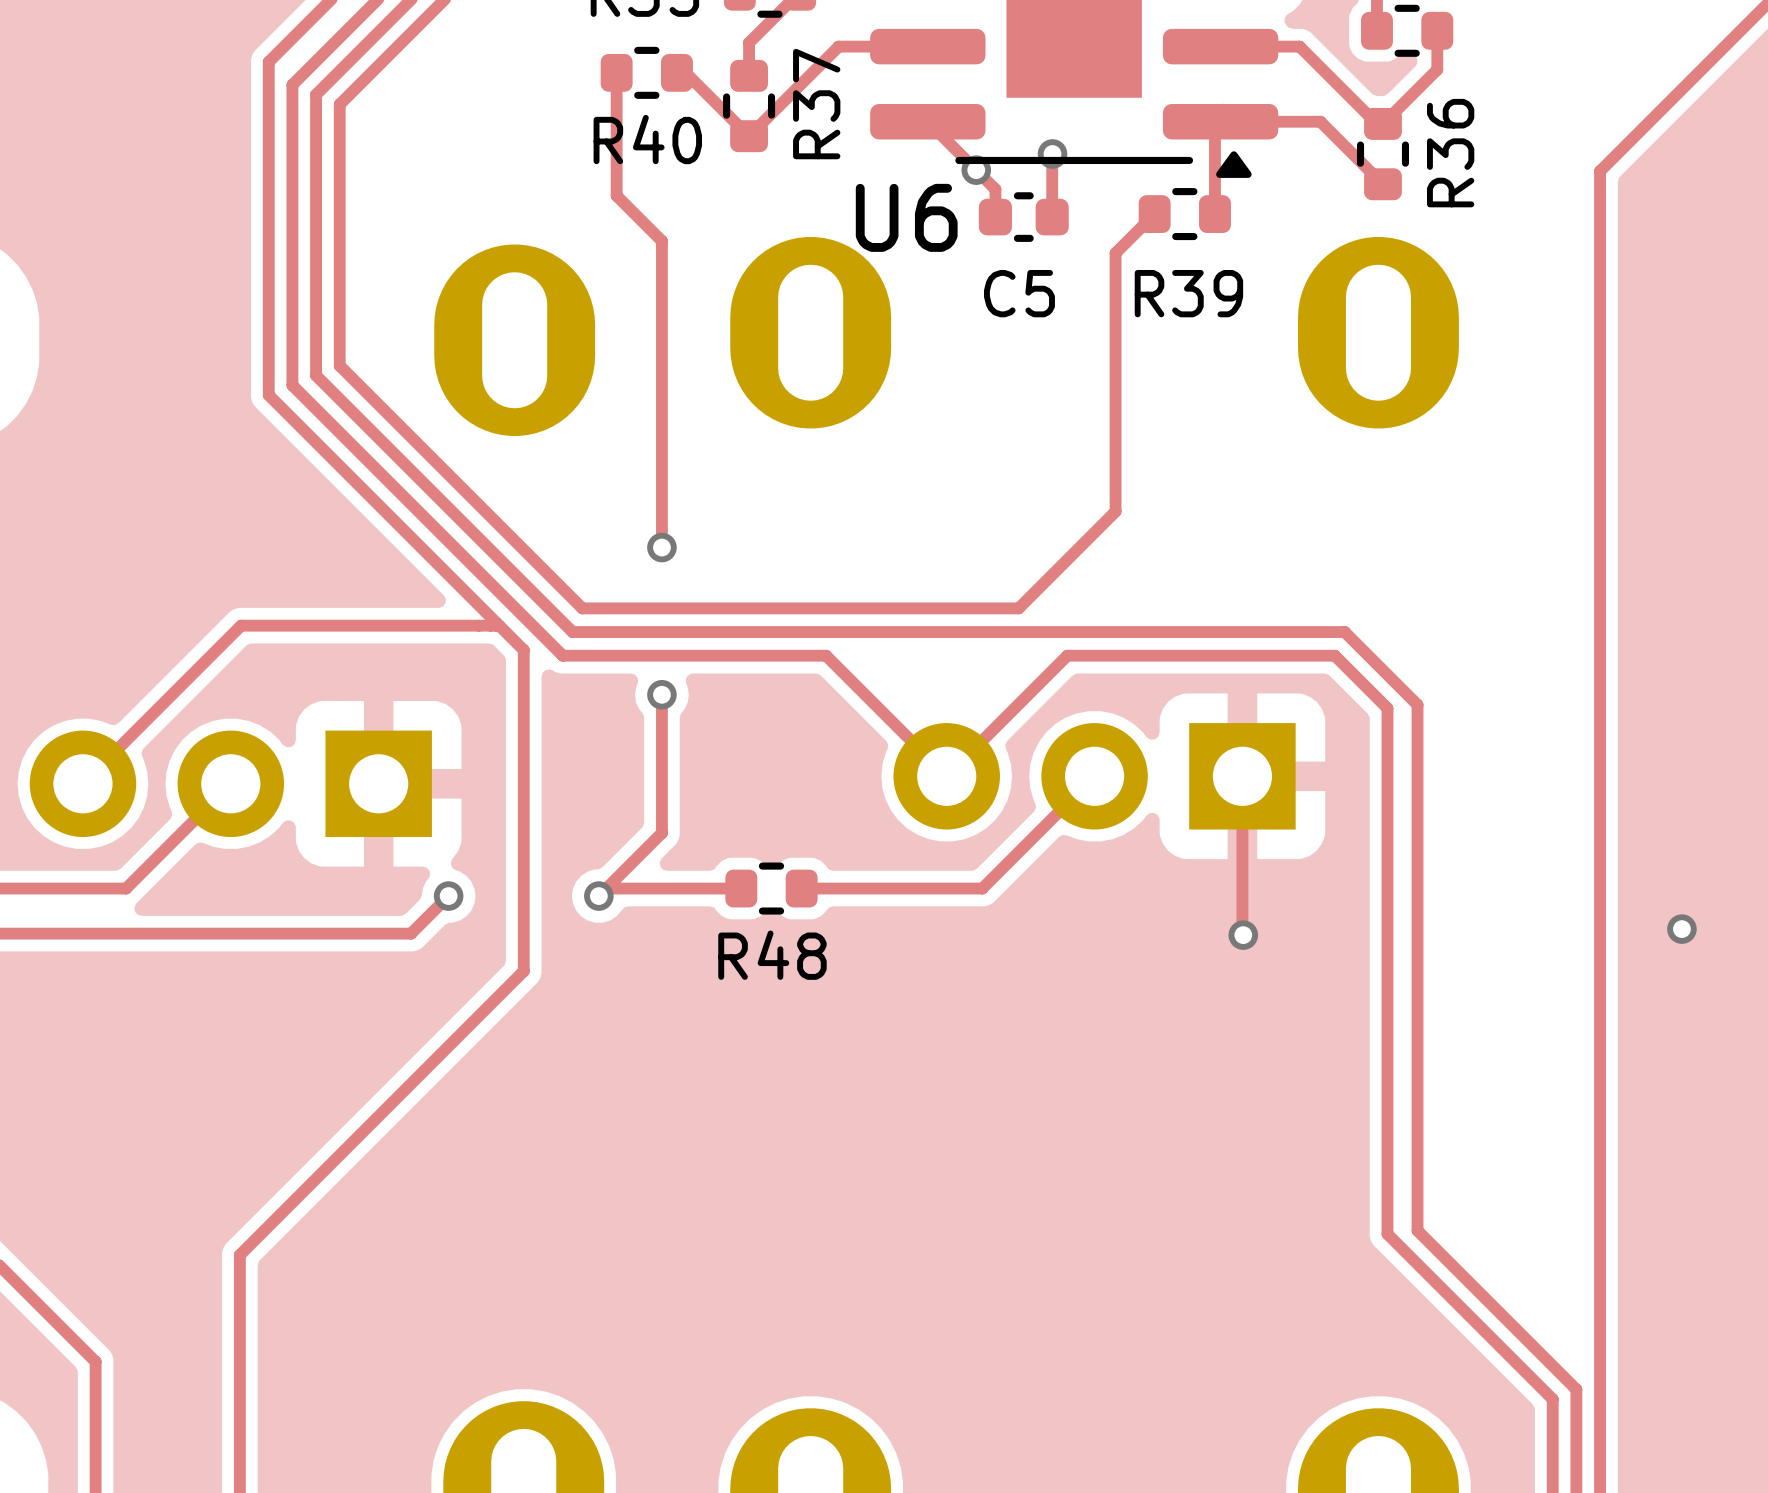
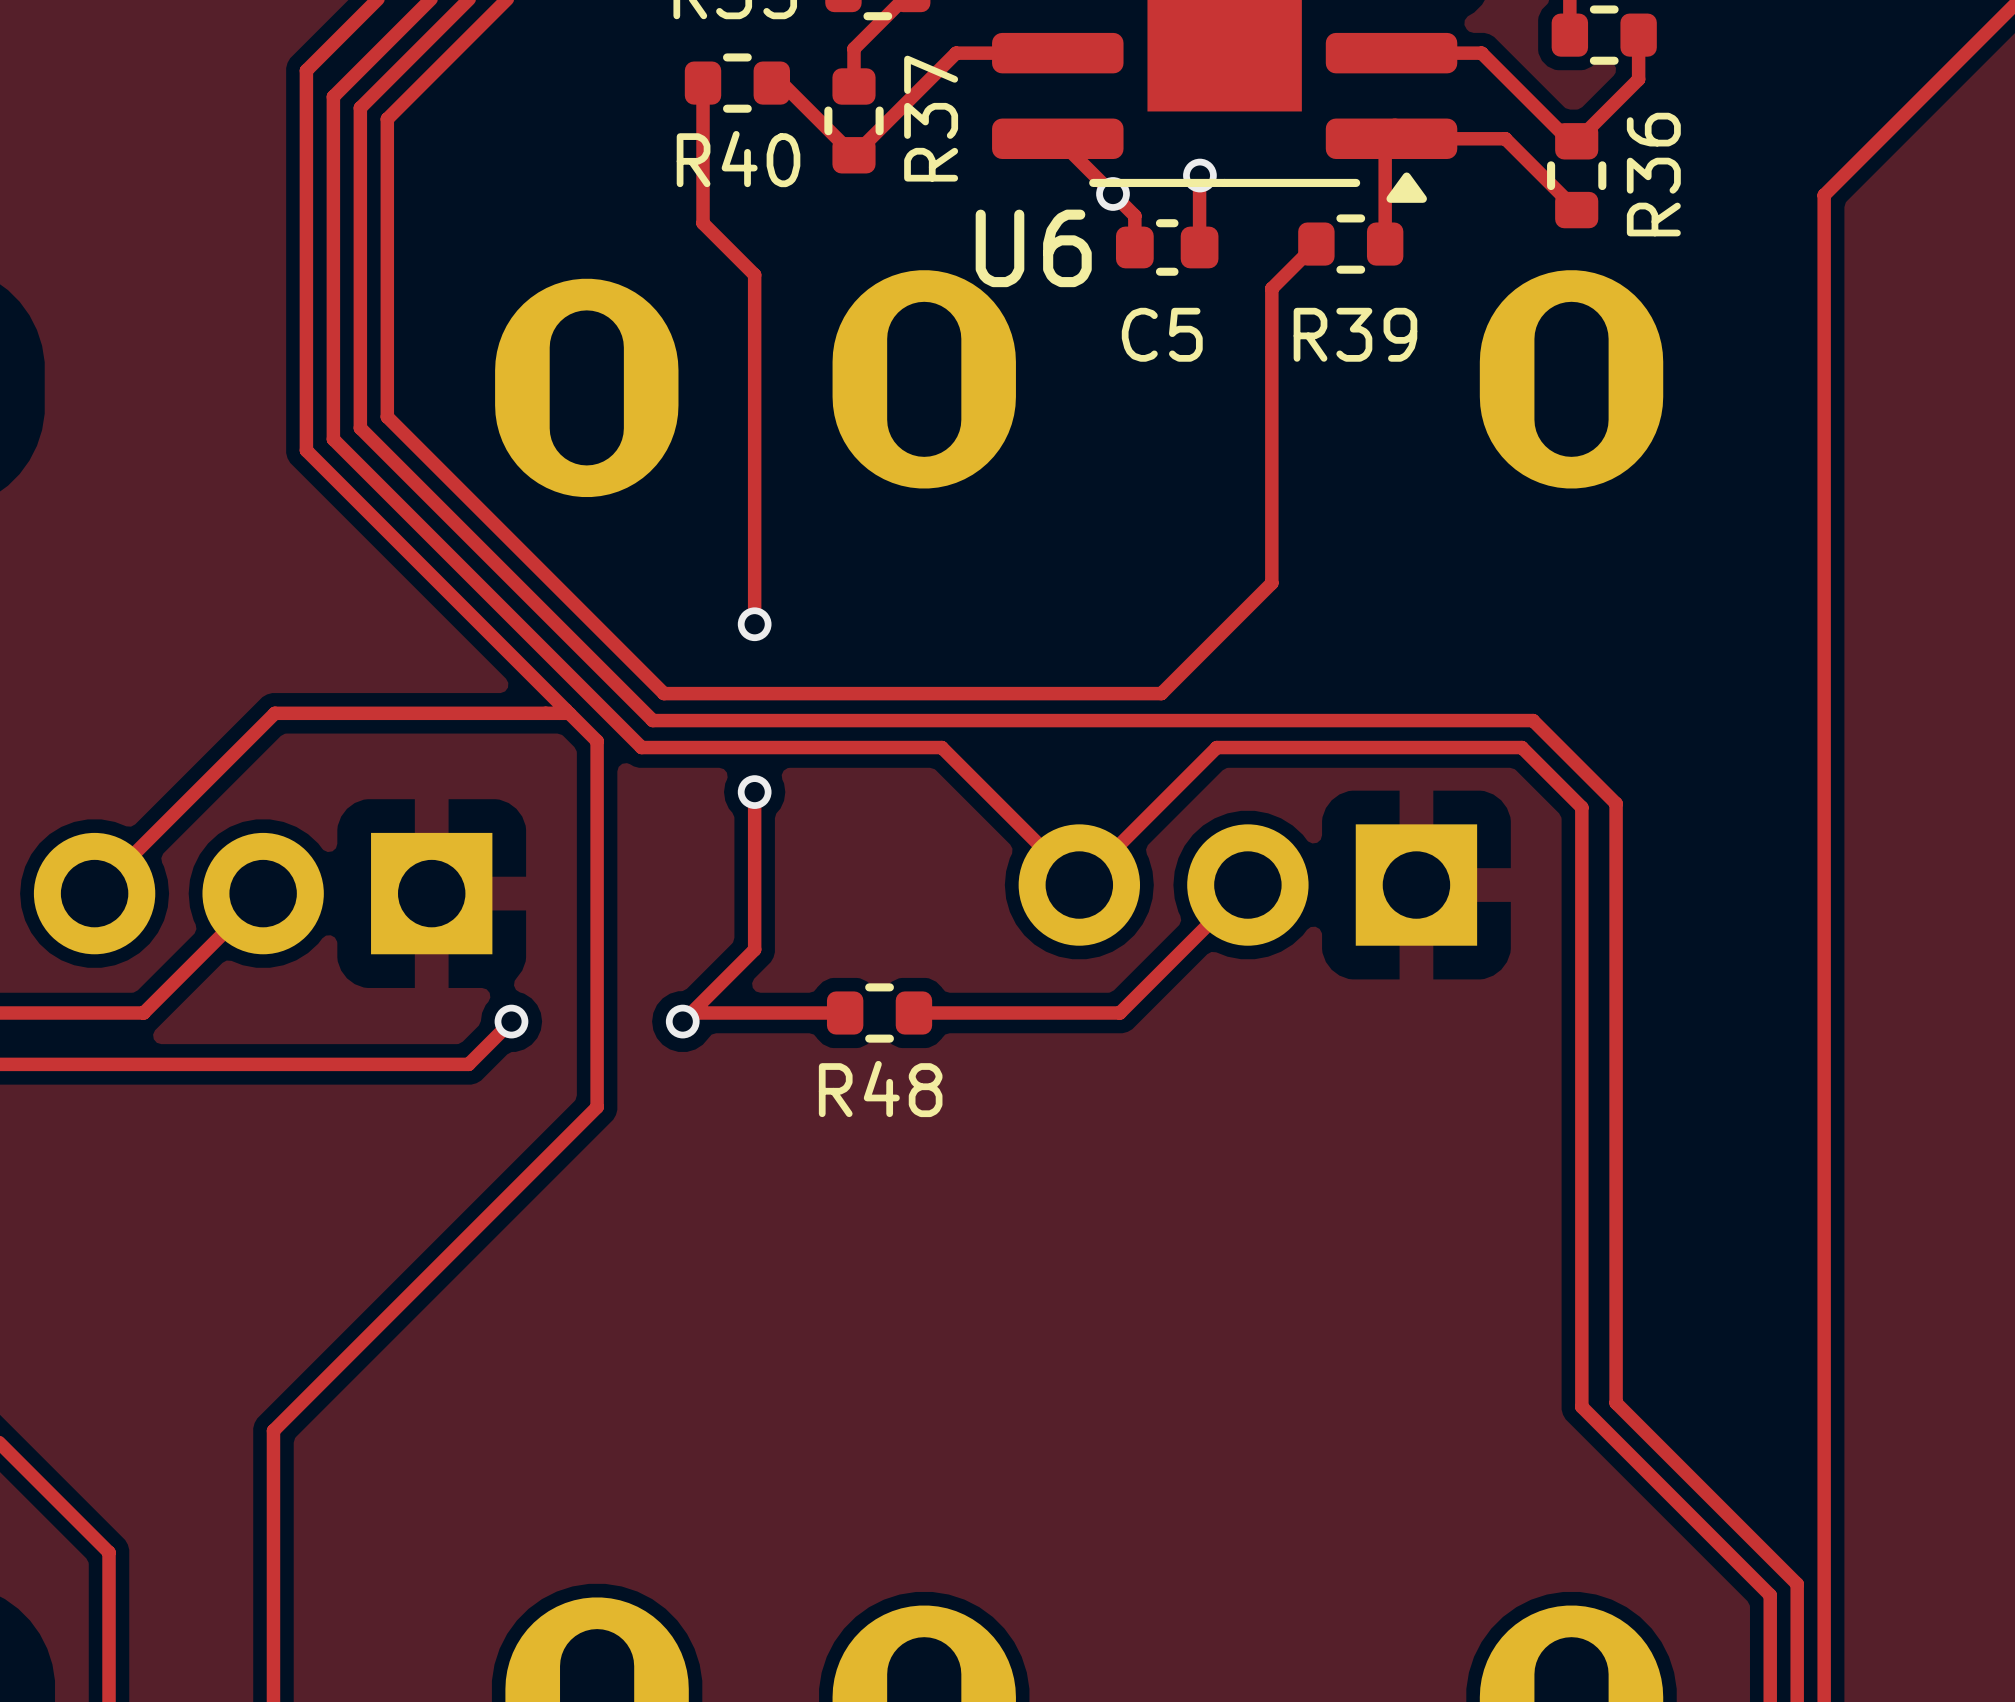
track: (1242, 776) (1243, 935) -> none
via: (1681, 929) -> none
via: (1243, 935) -> none

